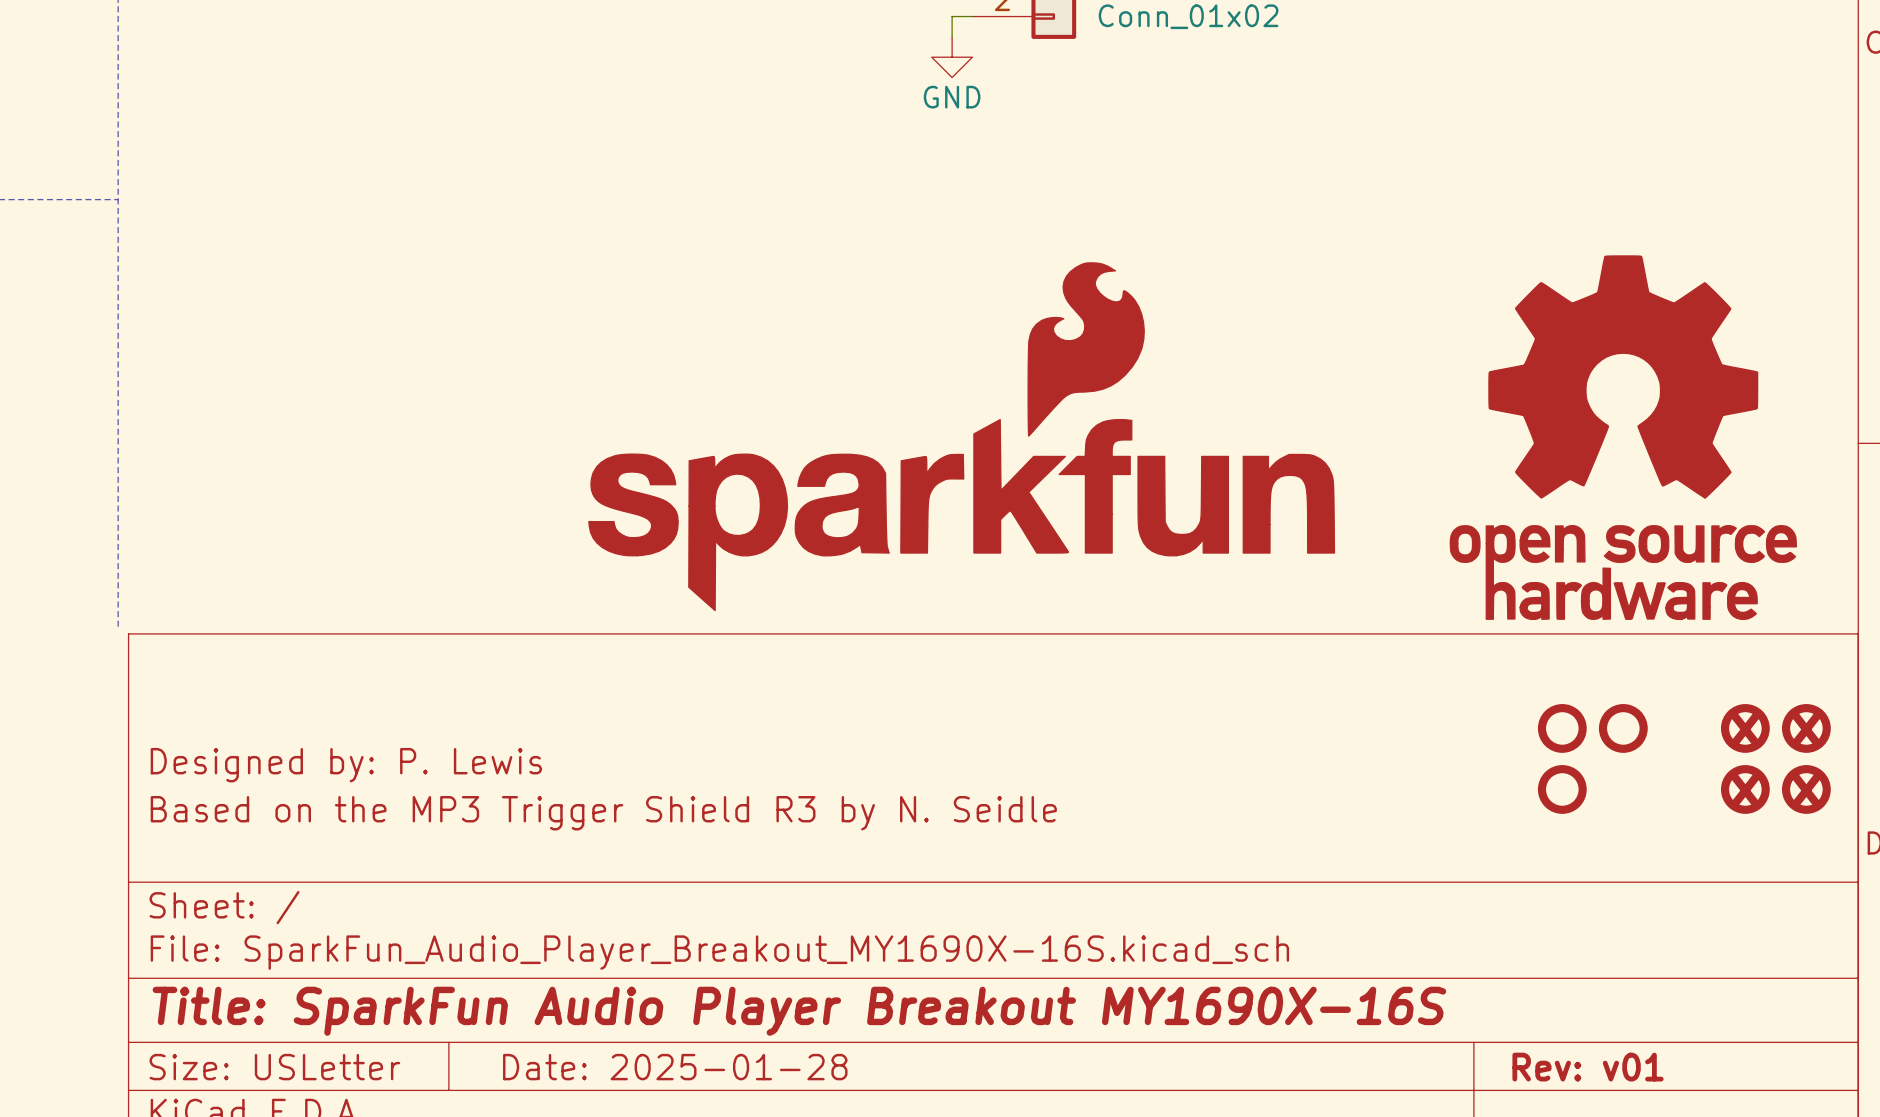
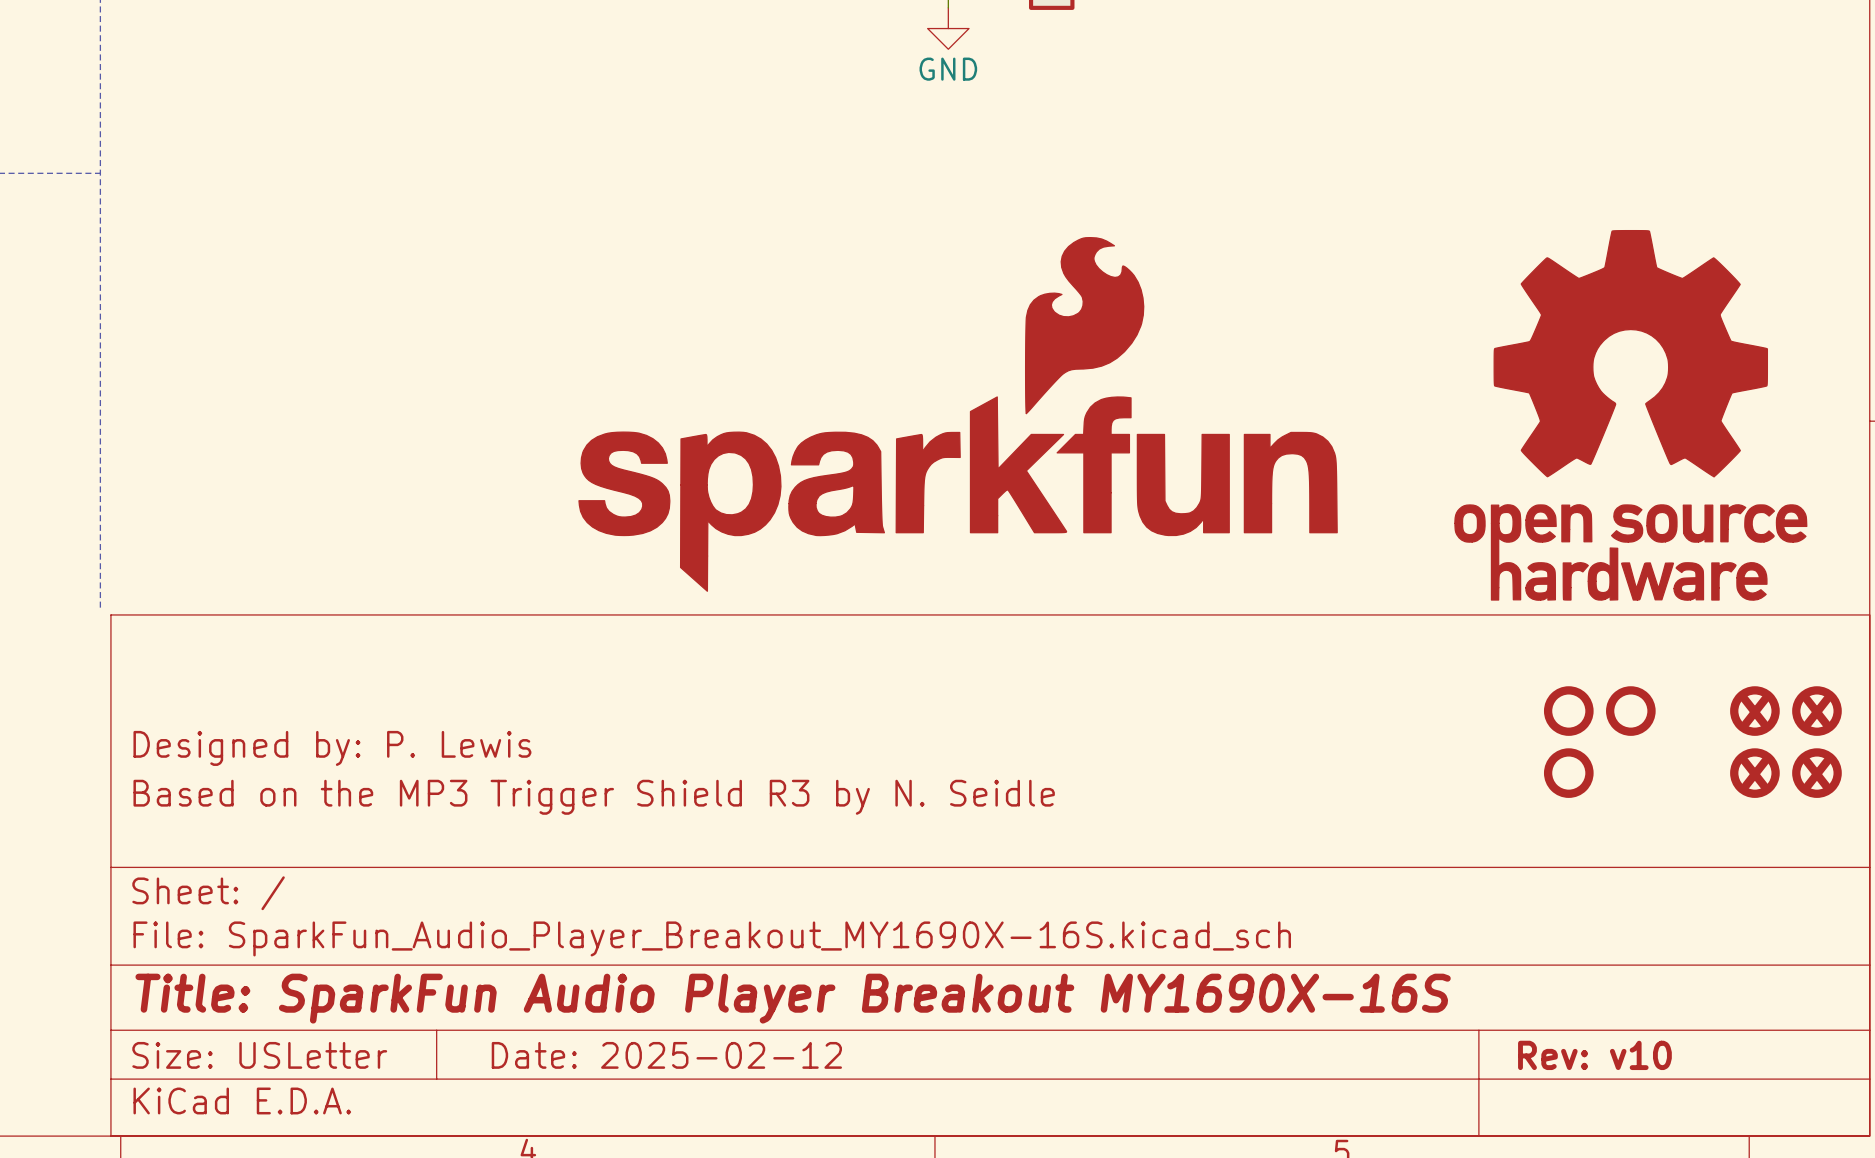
title block: Date: 2025-01-28 (675, 1067) -> Date: 2025-02-12 (666, 1055)
title block: Rev: v01 (1588, 1067) -> Rev: v10 (1594, 1055)

